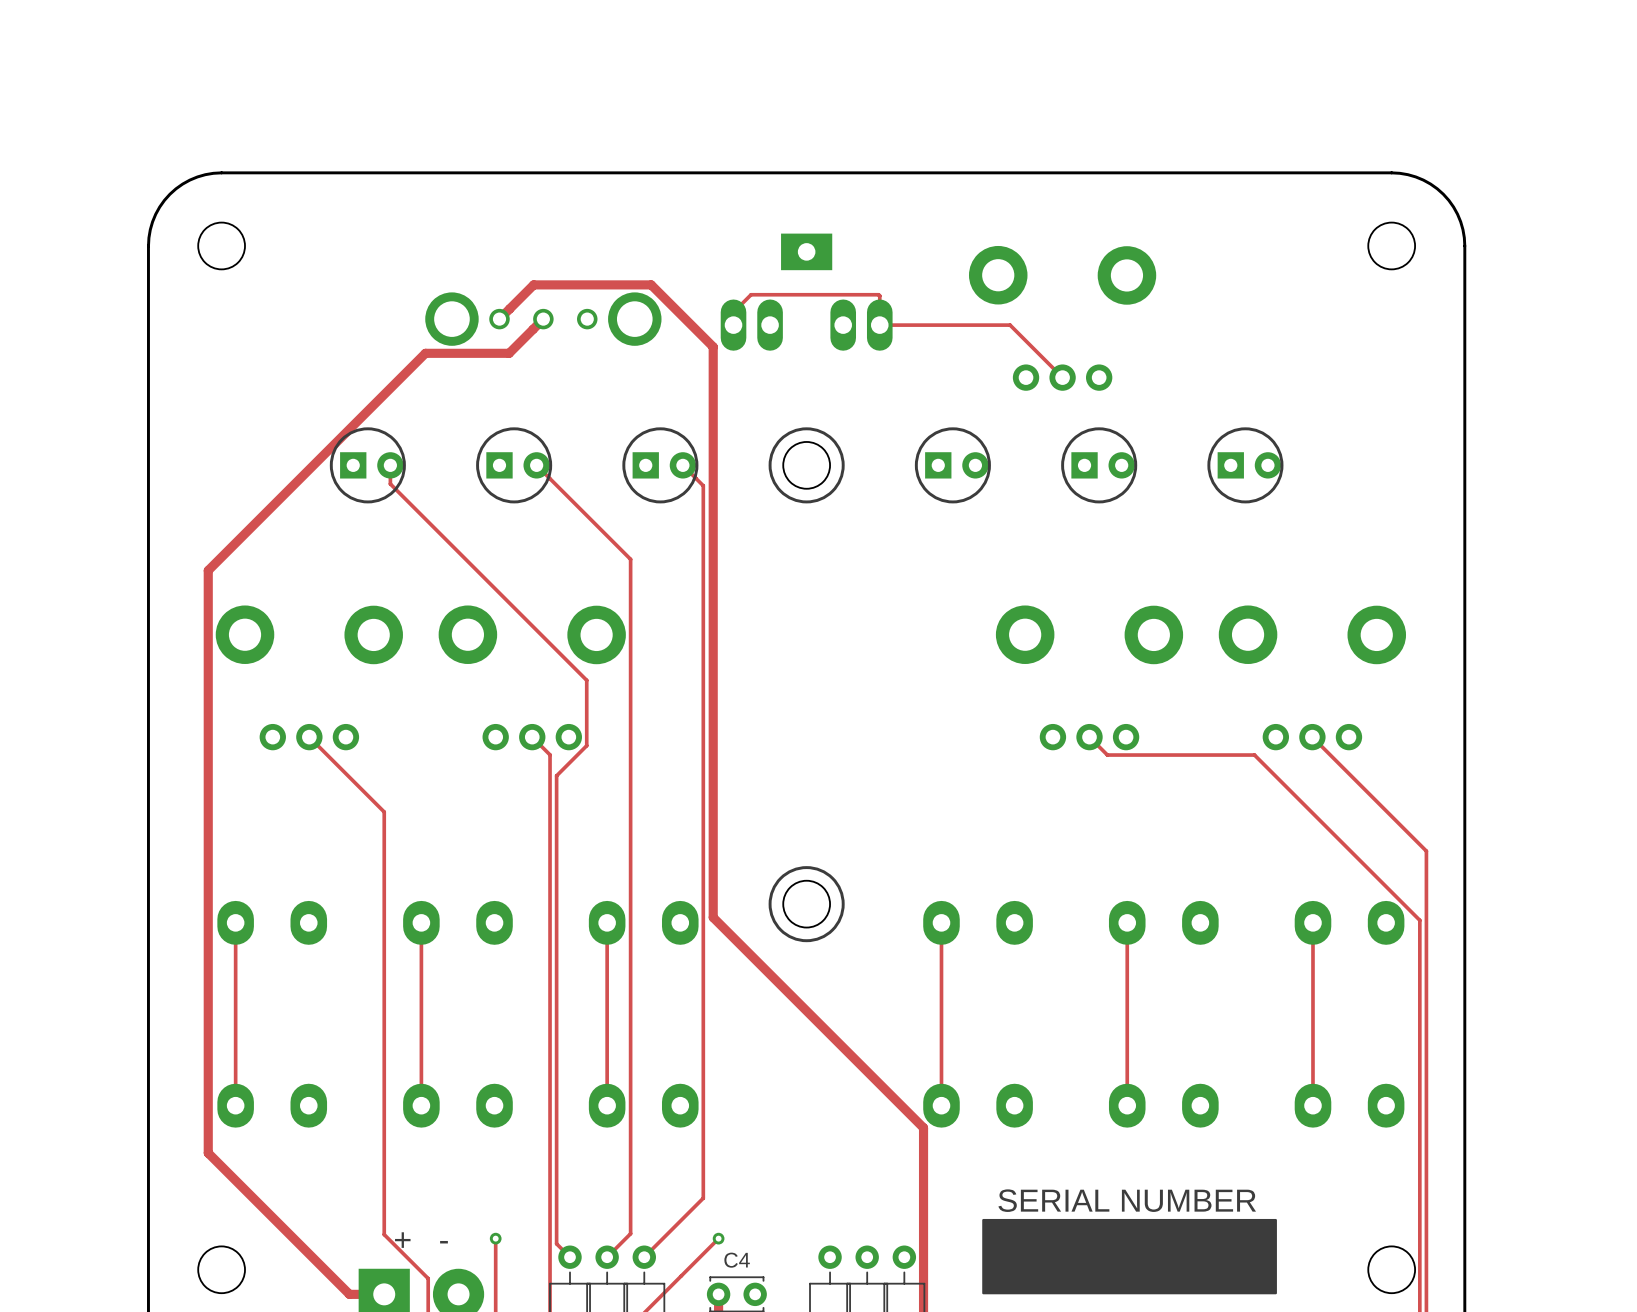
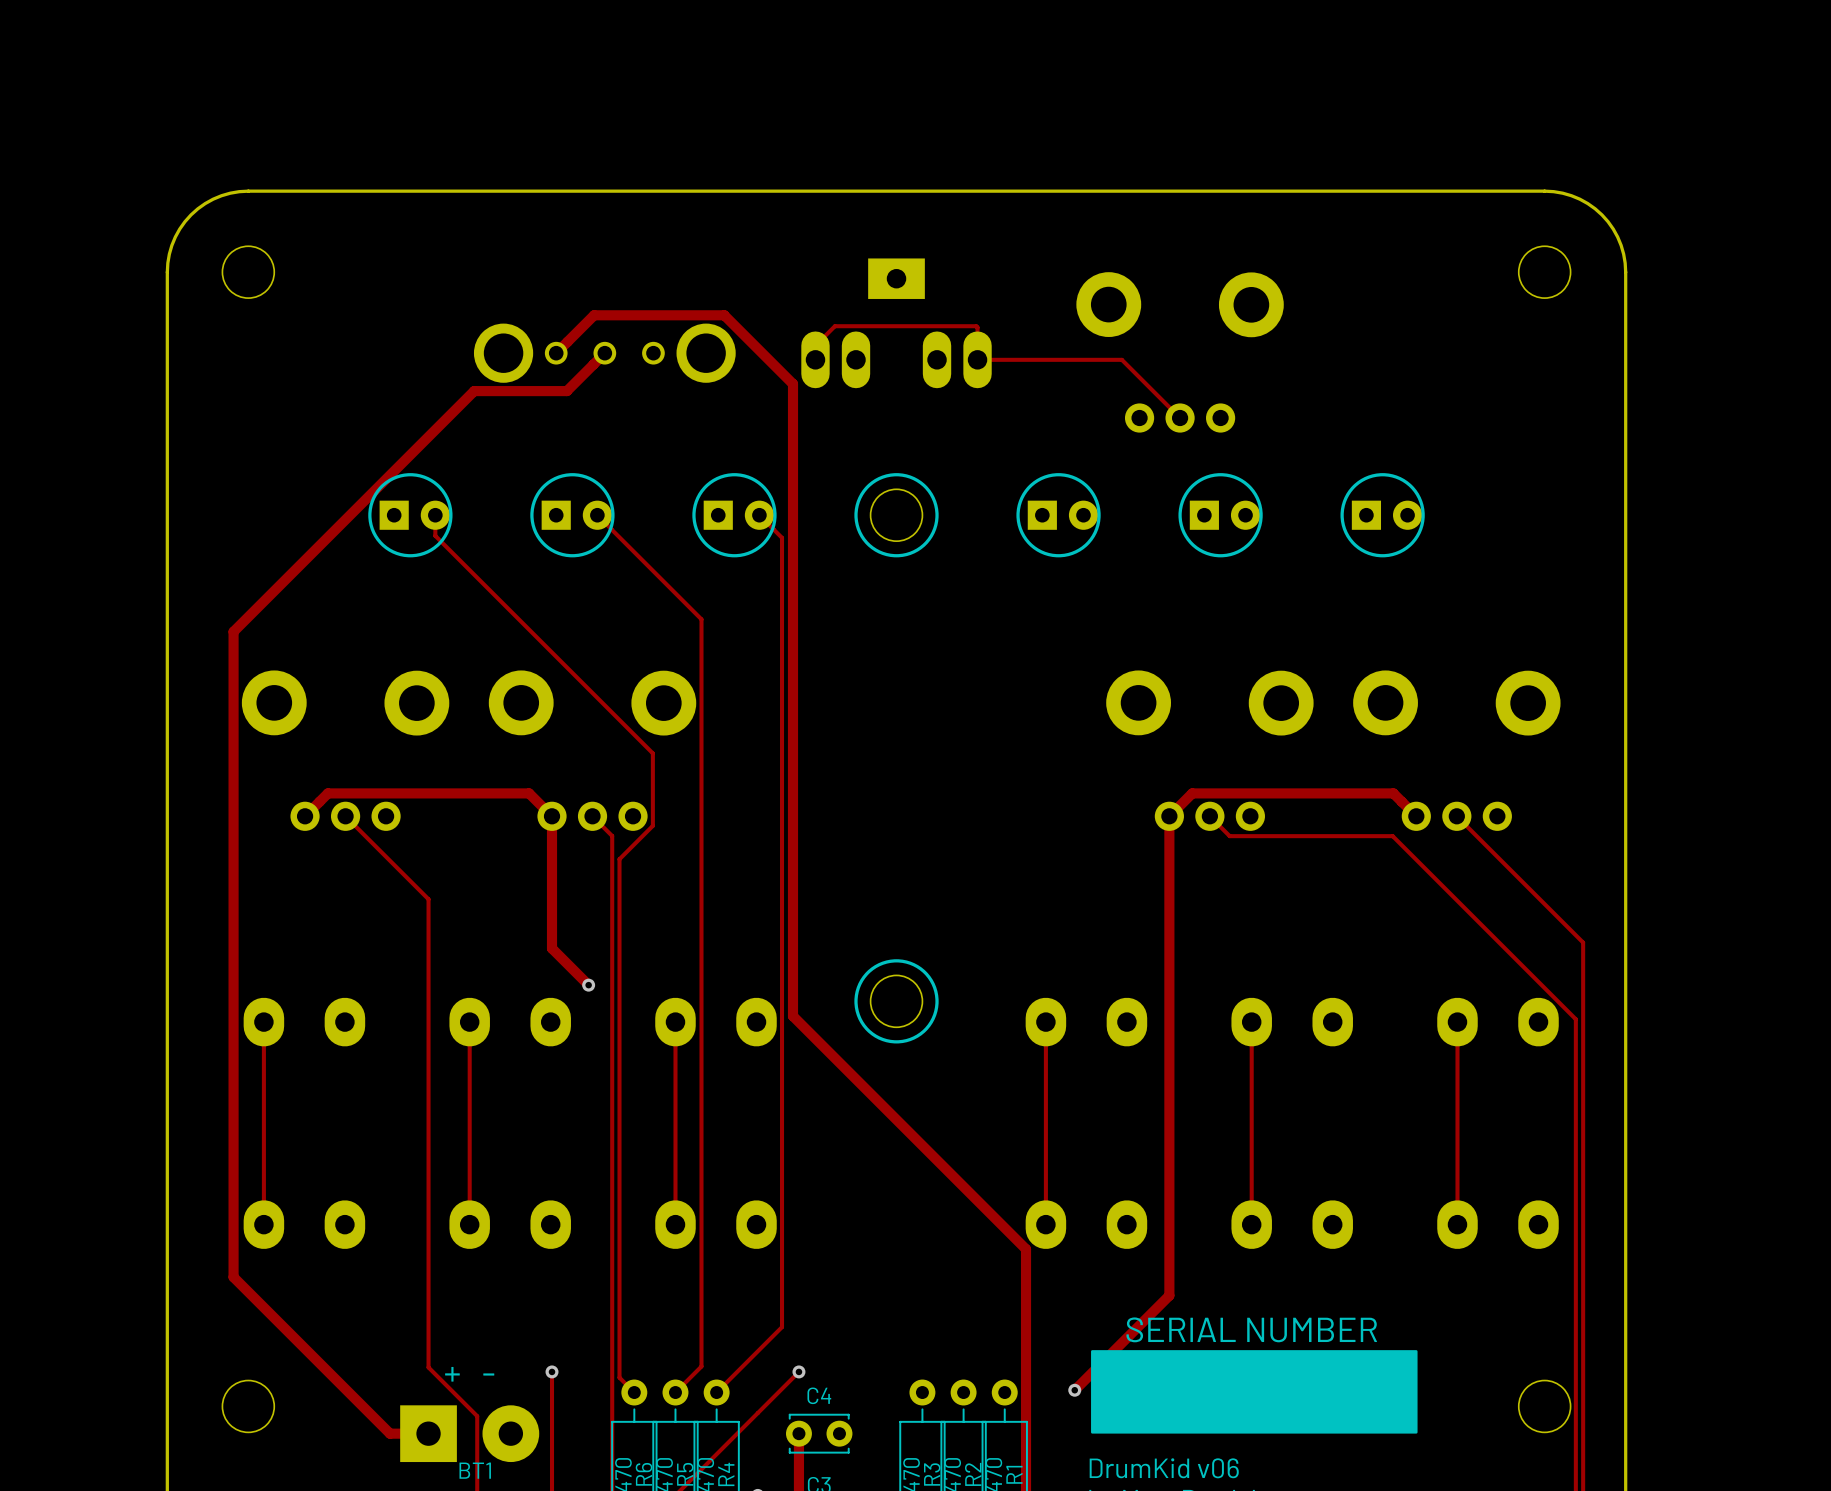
track: none -> (305, 816) (327, 793) (529, 793) (552, 816) (552, 948) (588, 985)
track: none -> (1416, 816) (1393, 793) (1192, 793) (1169, 816) (1169, 1295) (1074, 1390)
via: none -> (588, 985)
via: none -> (1074, 1390)

